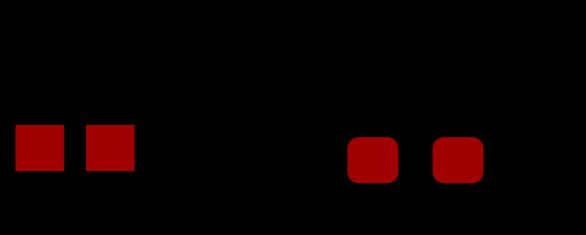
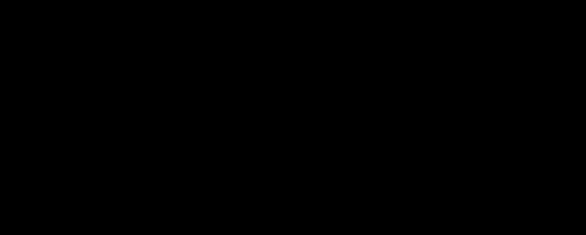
part: (75, 148) -> none
part: (415, 160) -> none

